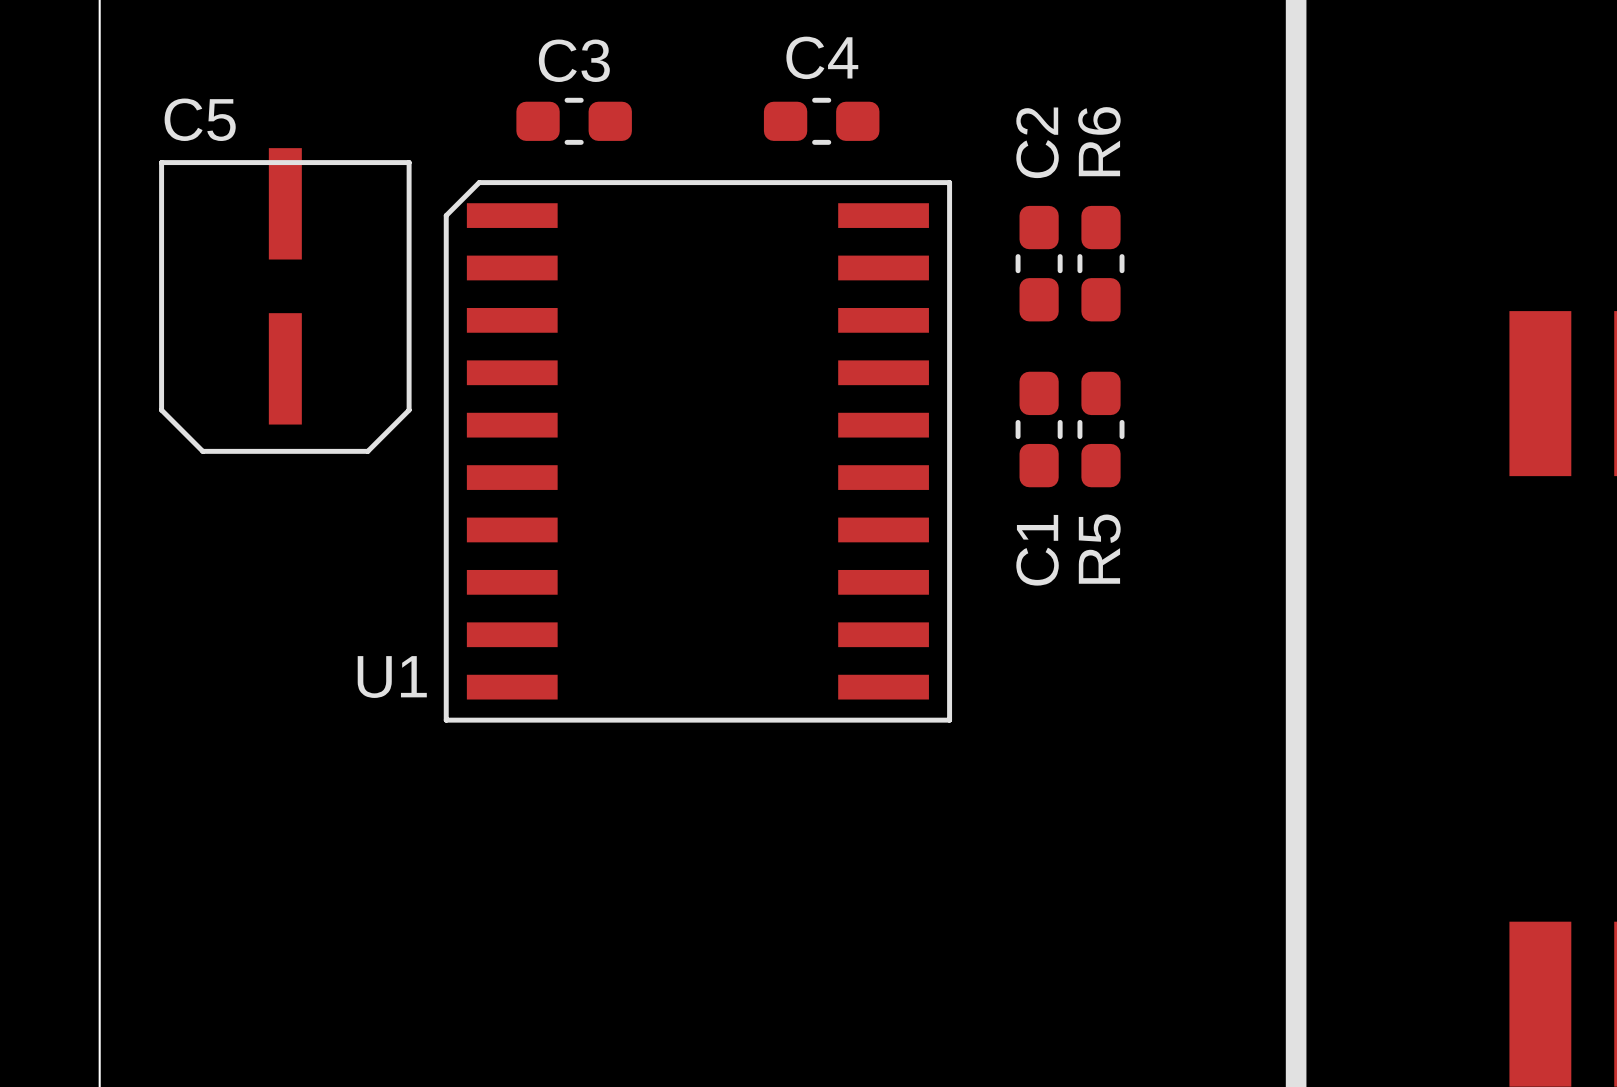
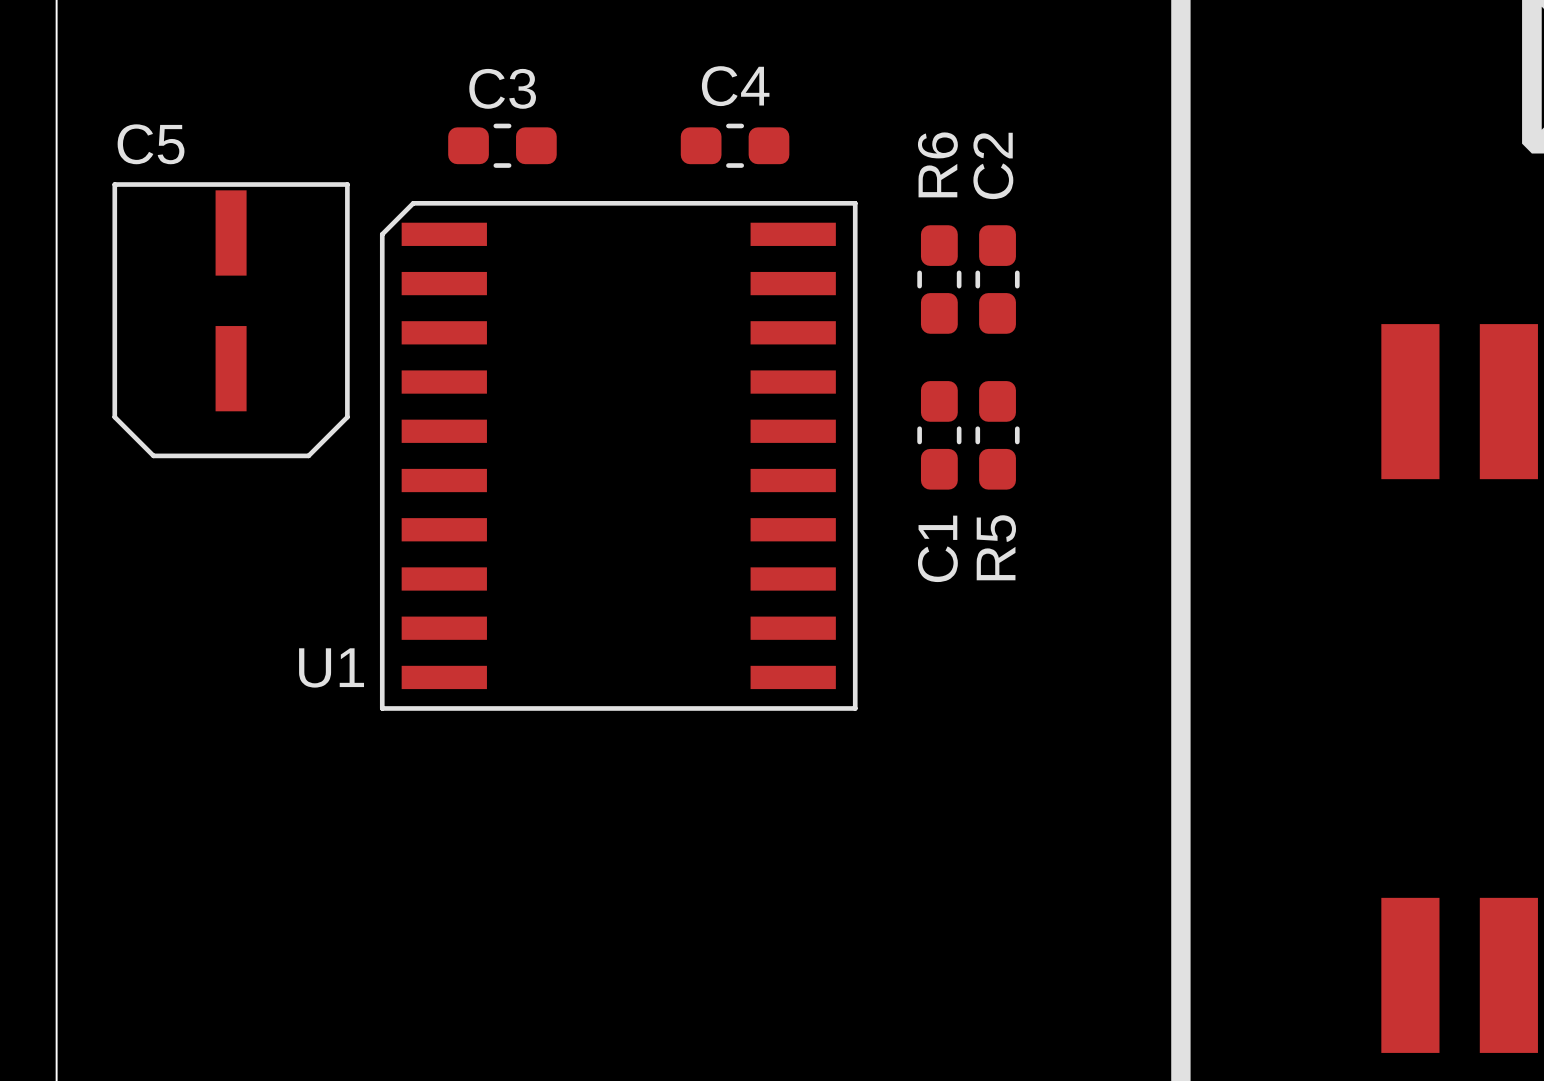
R6 name position: R6 (1099, 141) -> R6 (937, 164)
C2 name position: C2 (1037, 142) -> C2 (993, 165)
C5 footprint: [159, 148, 412, 454] -> [112, 182, 350, 459]

